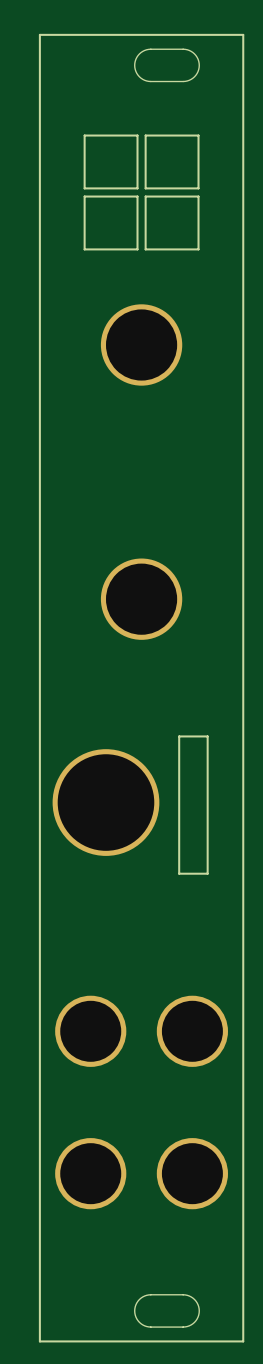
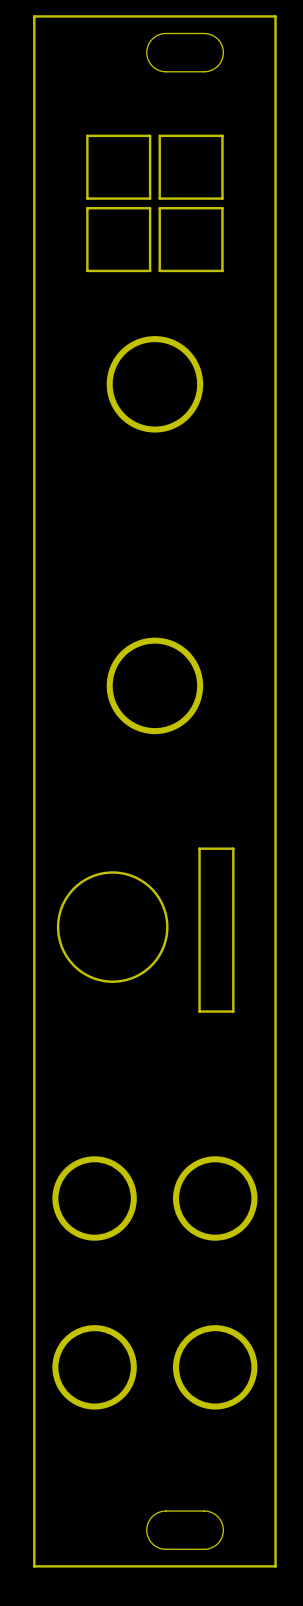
round board edge: none -> [56, 871, 169, 983]
part: (105, 802) -> none

